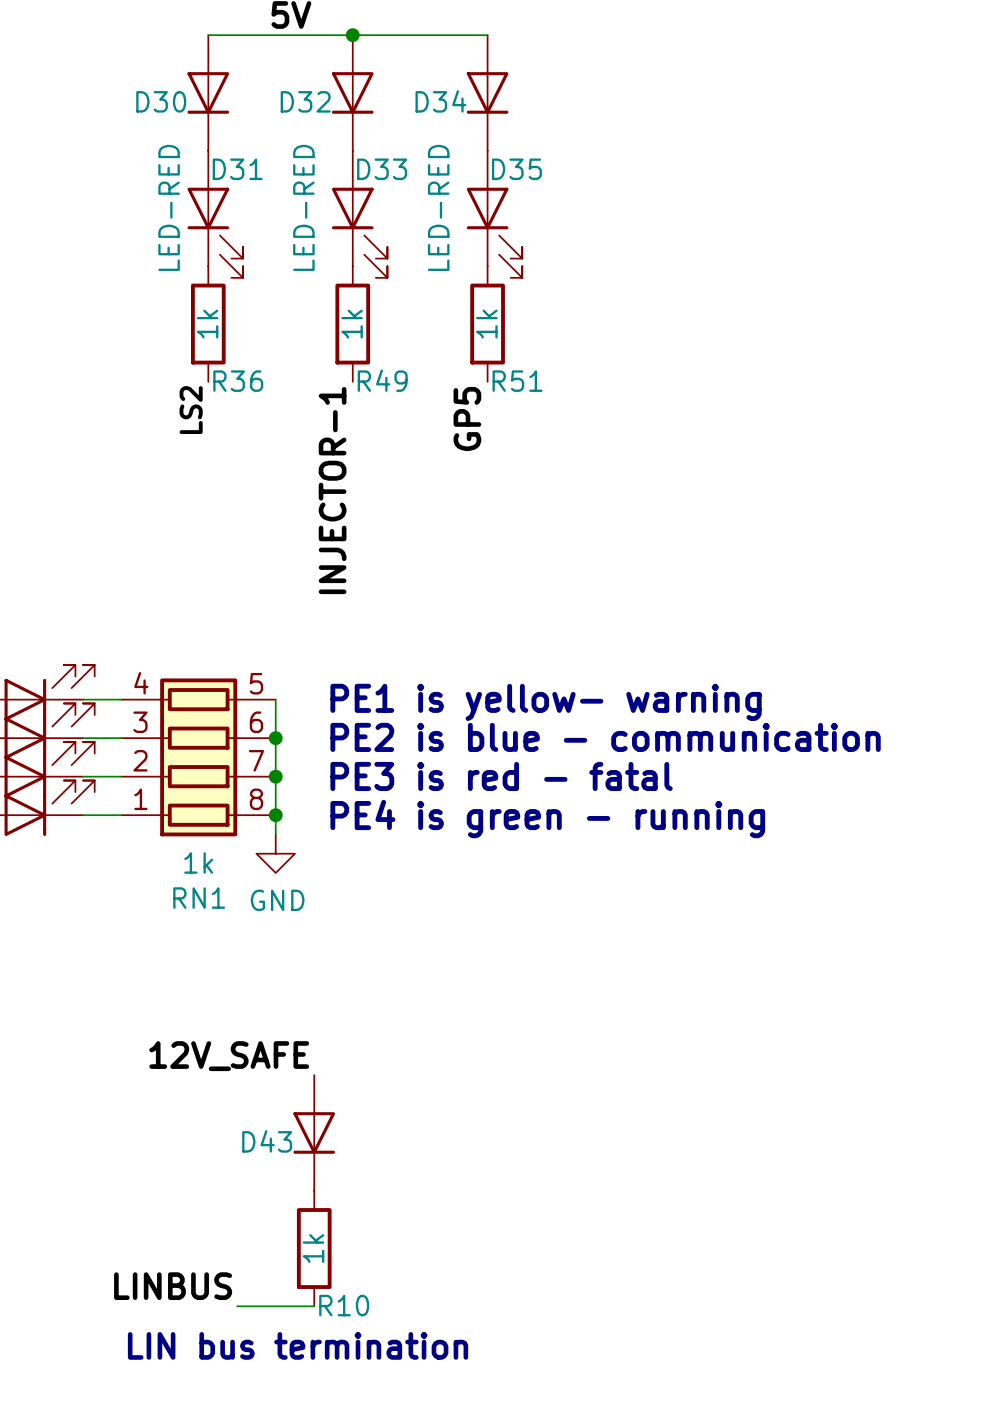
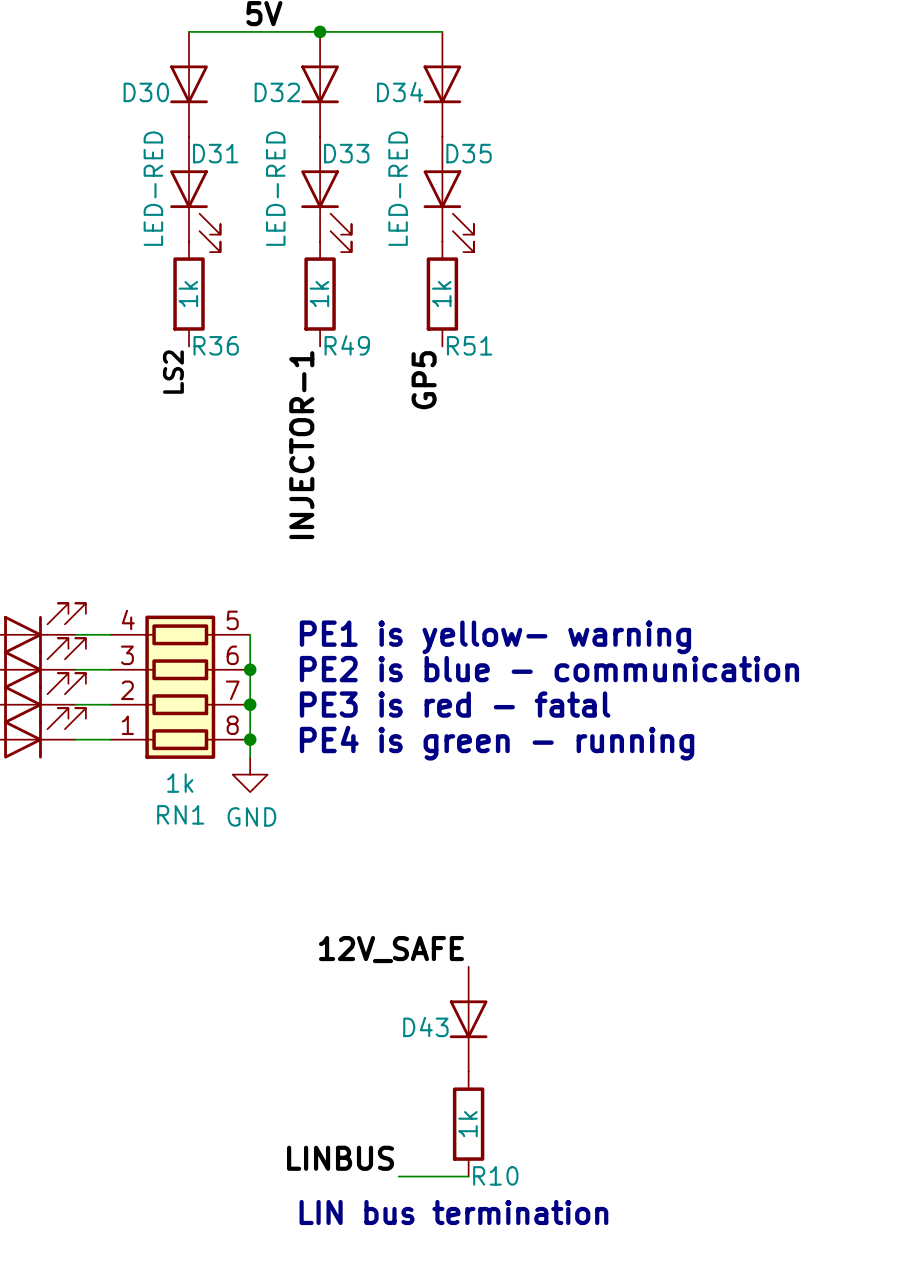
label position: 12V_SAFE (229, 1056) -> 12V_SAFE (391, 949)
D43 position: (314, 1132) -> (468, 1019)
R10 position: (314, 1248) -> (468, 1124)
label position: LINBUS (173, 1286) -> LINBUS (340, 1158)
wire: (237, 1306) (314, 1306) -> (398, 1176) (468, 1176)
text position: LIN bus termination (298, 1345) -> LIN bus termination (453, 1212)

